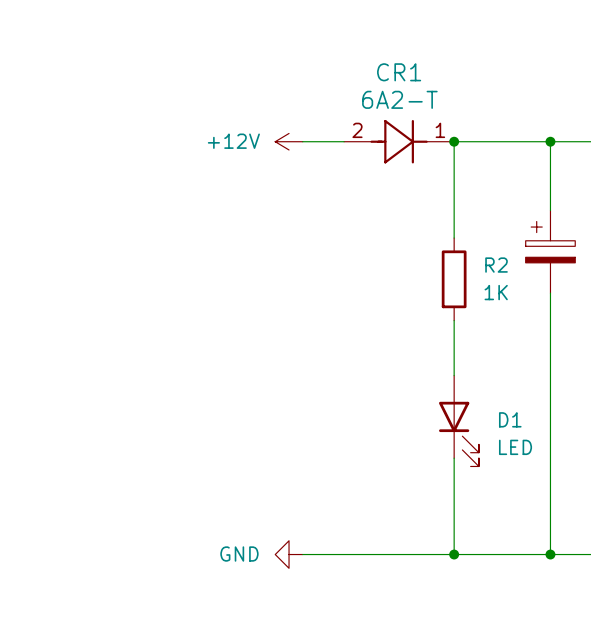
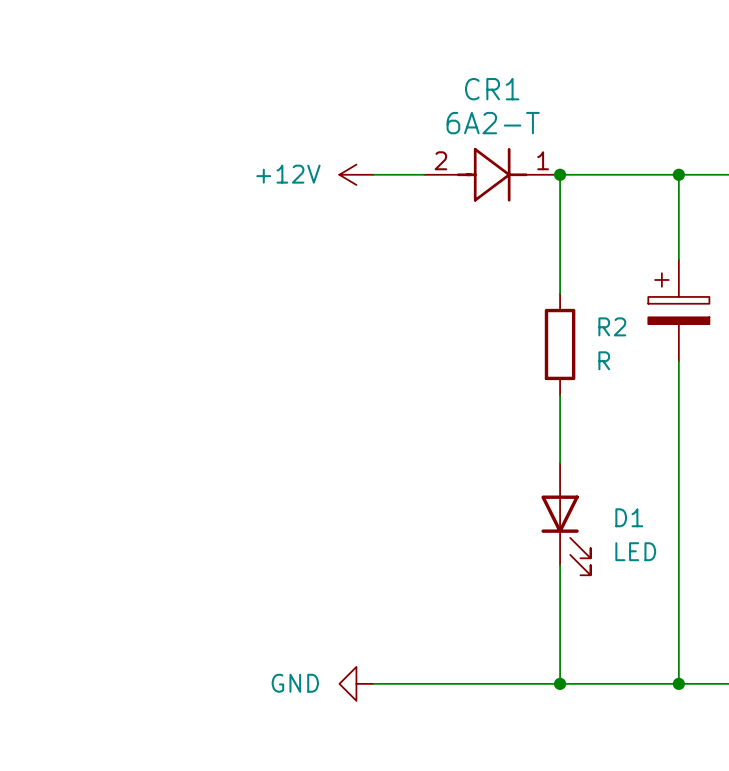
R2 value: 1K (496, 292) -> R (604, 360)

